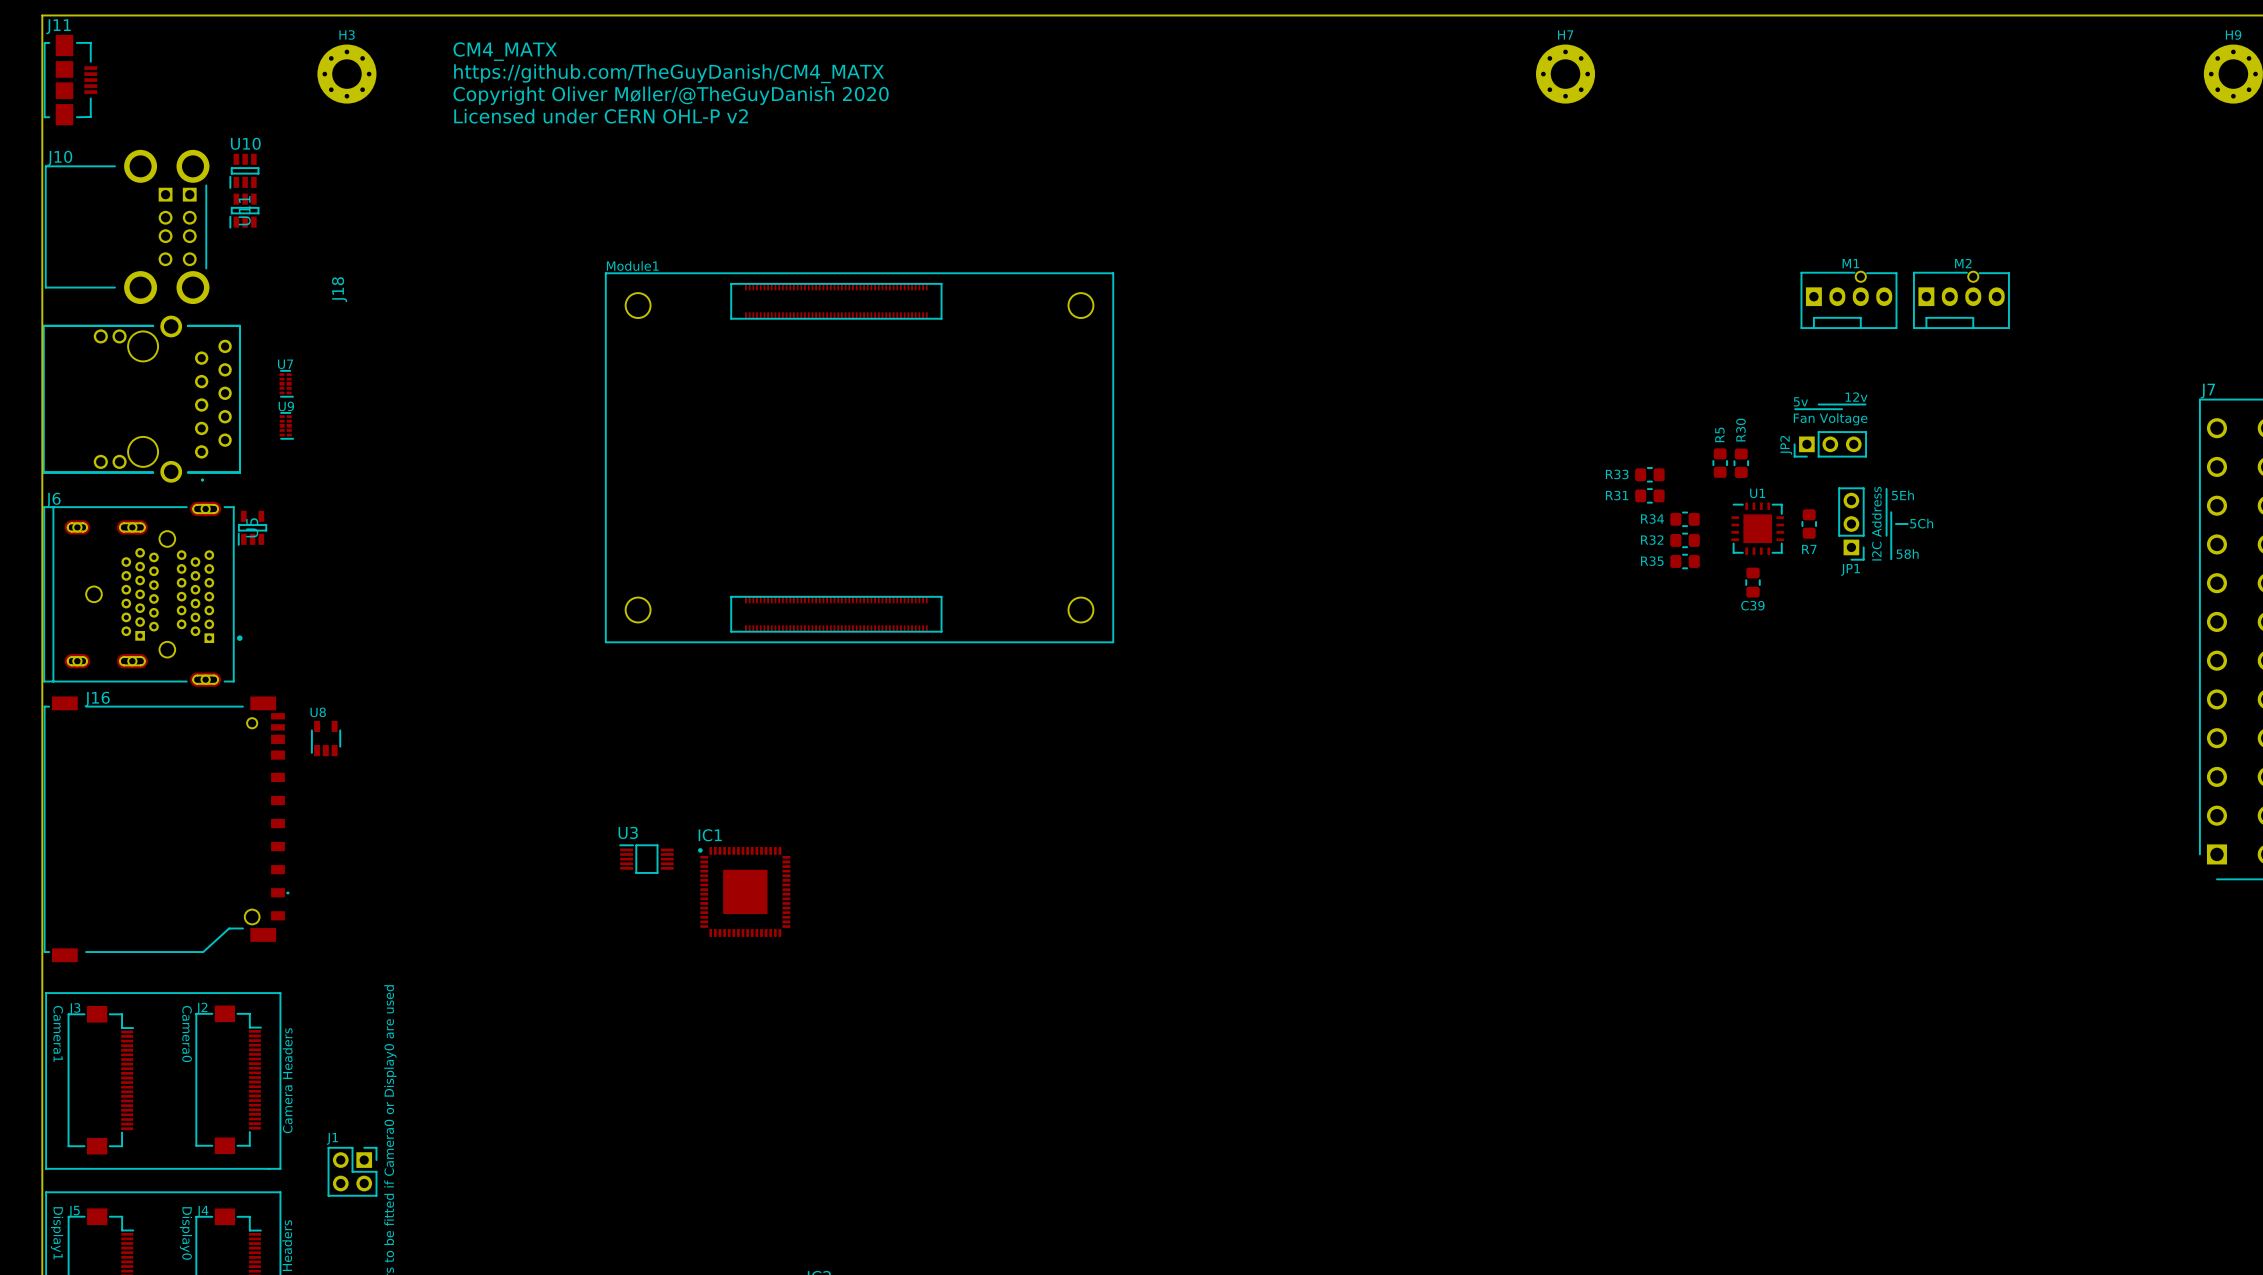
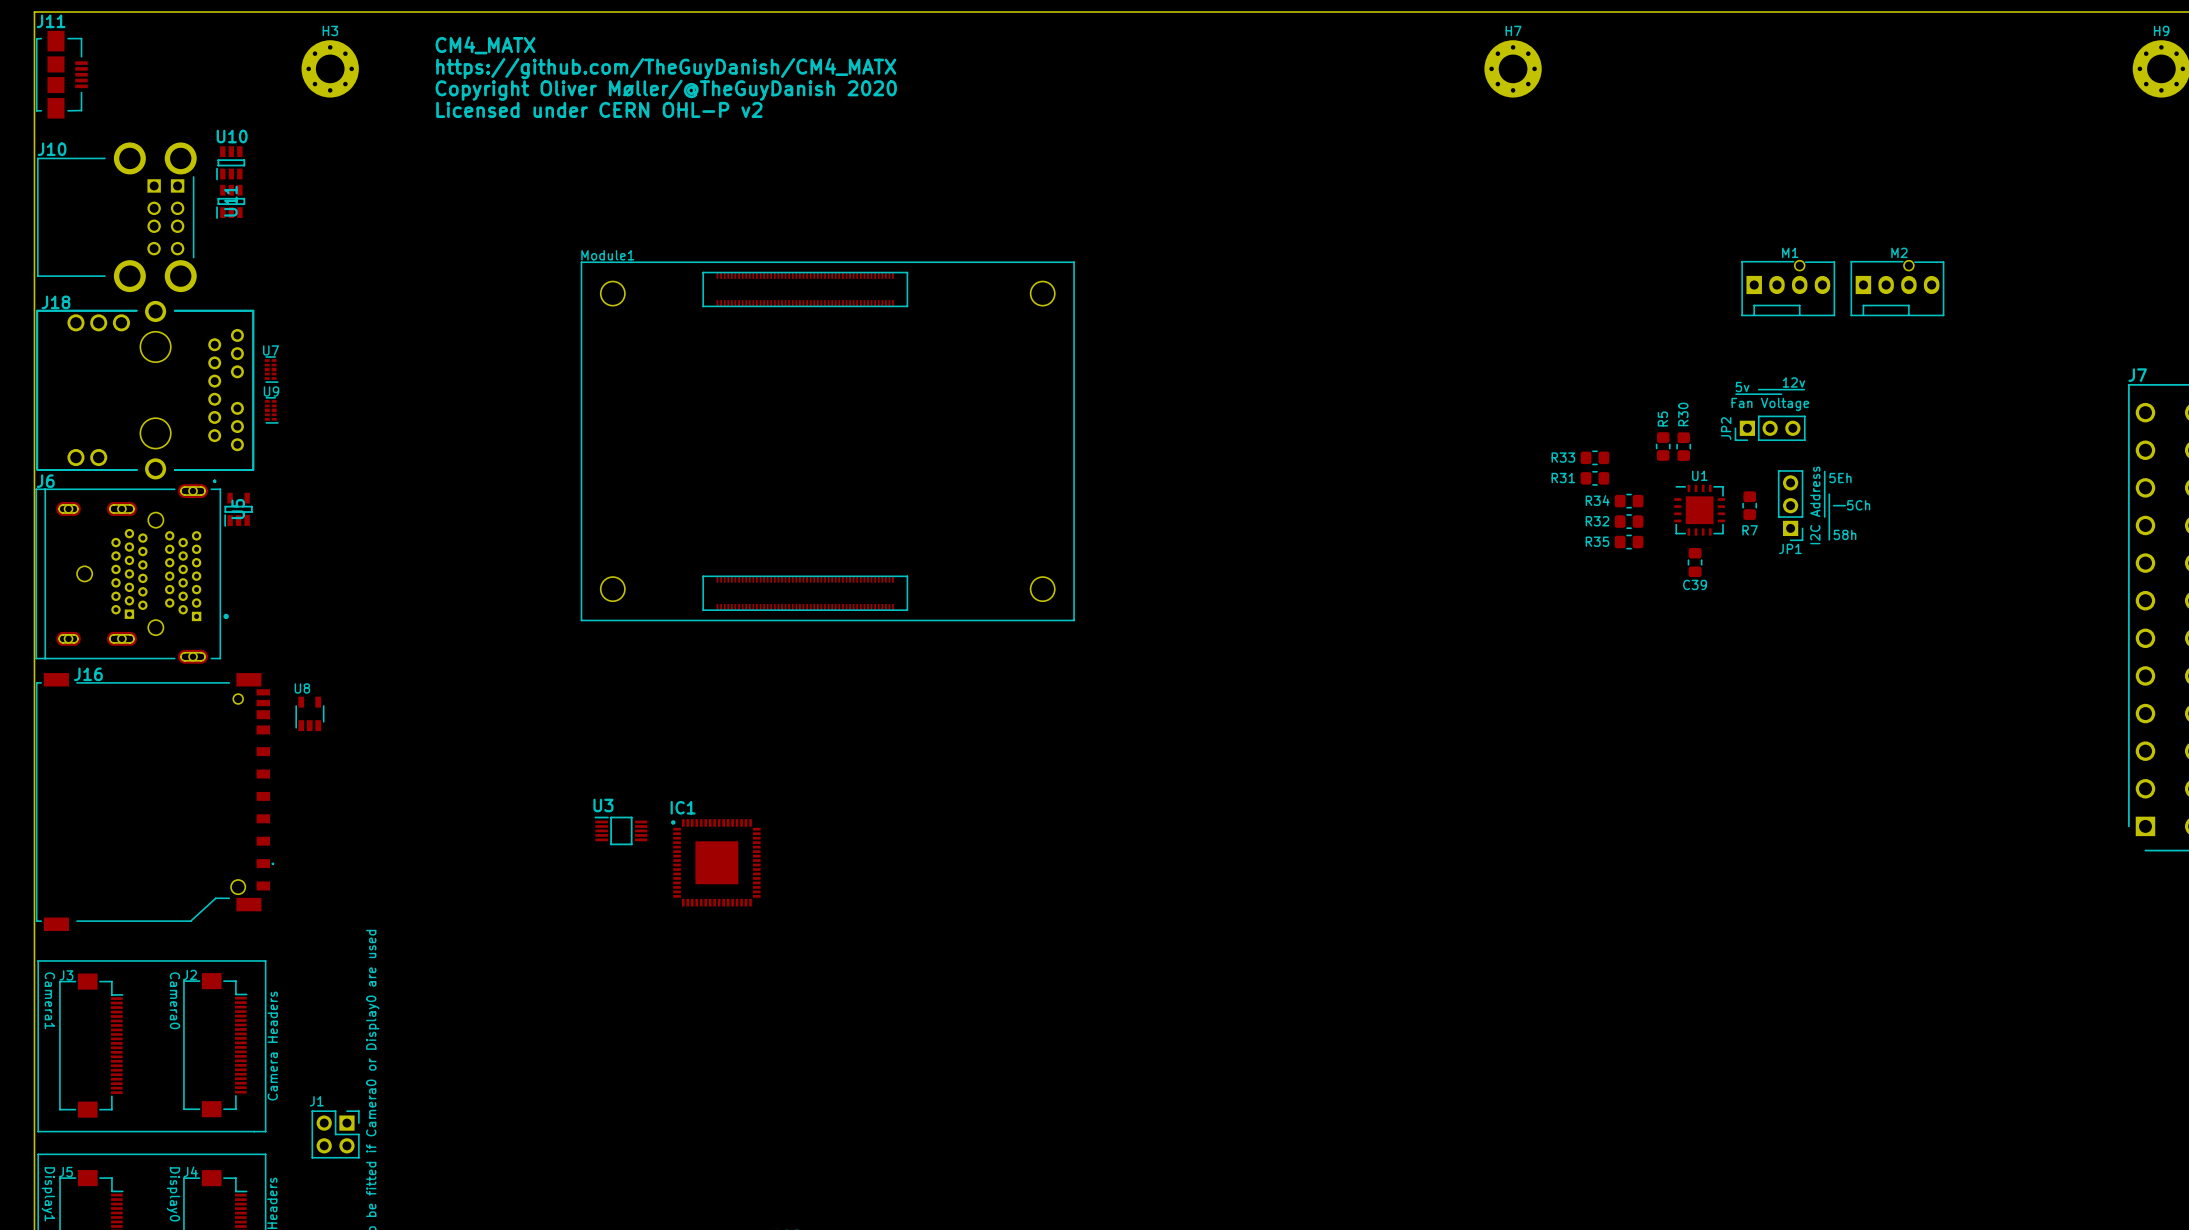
J18 name position: J18 (339, 289) -> J18 (55, 302)
J18 footprint: [42, 315, 241, 483] -> [36, 300, 254, 484]

